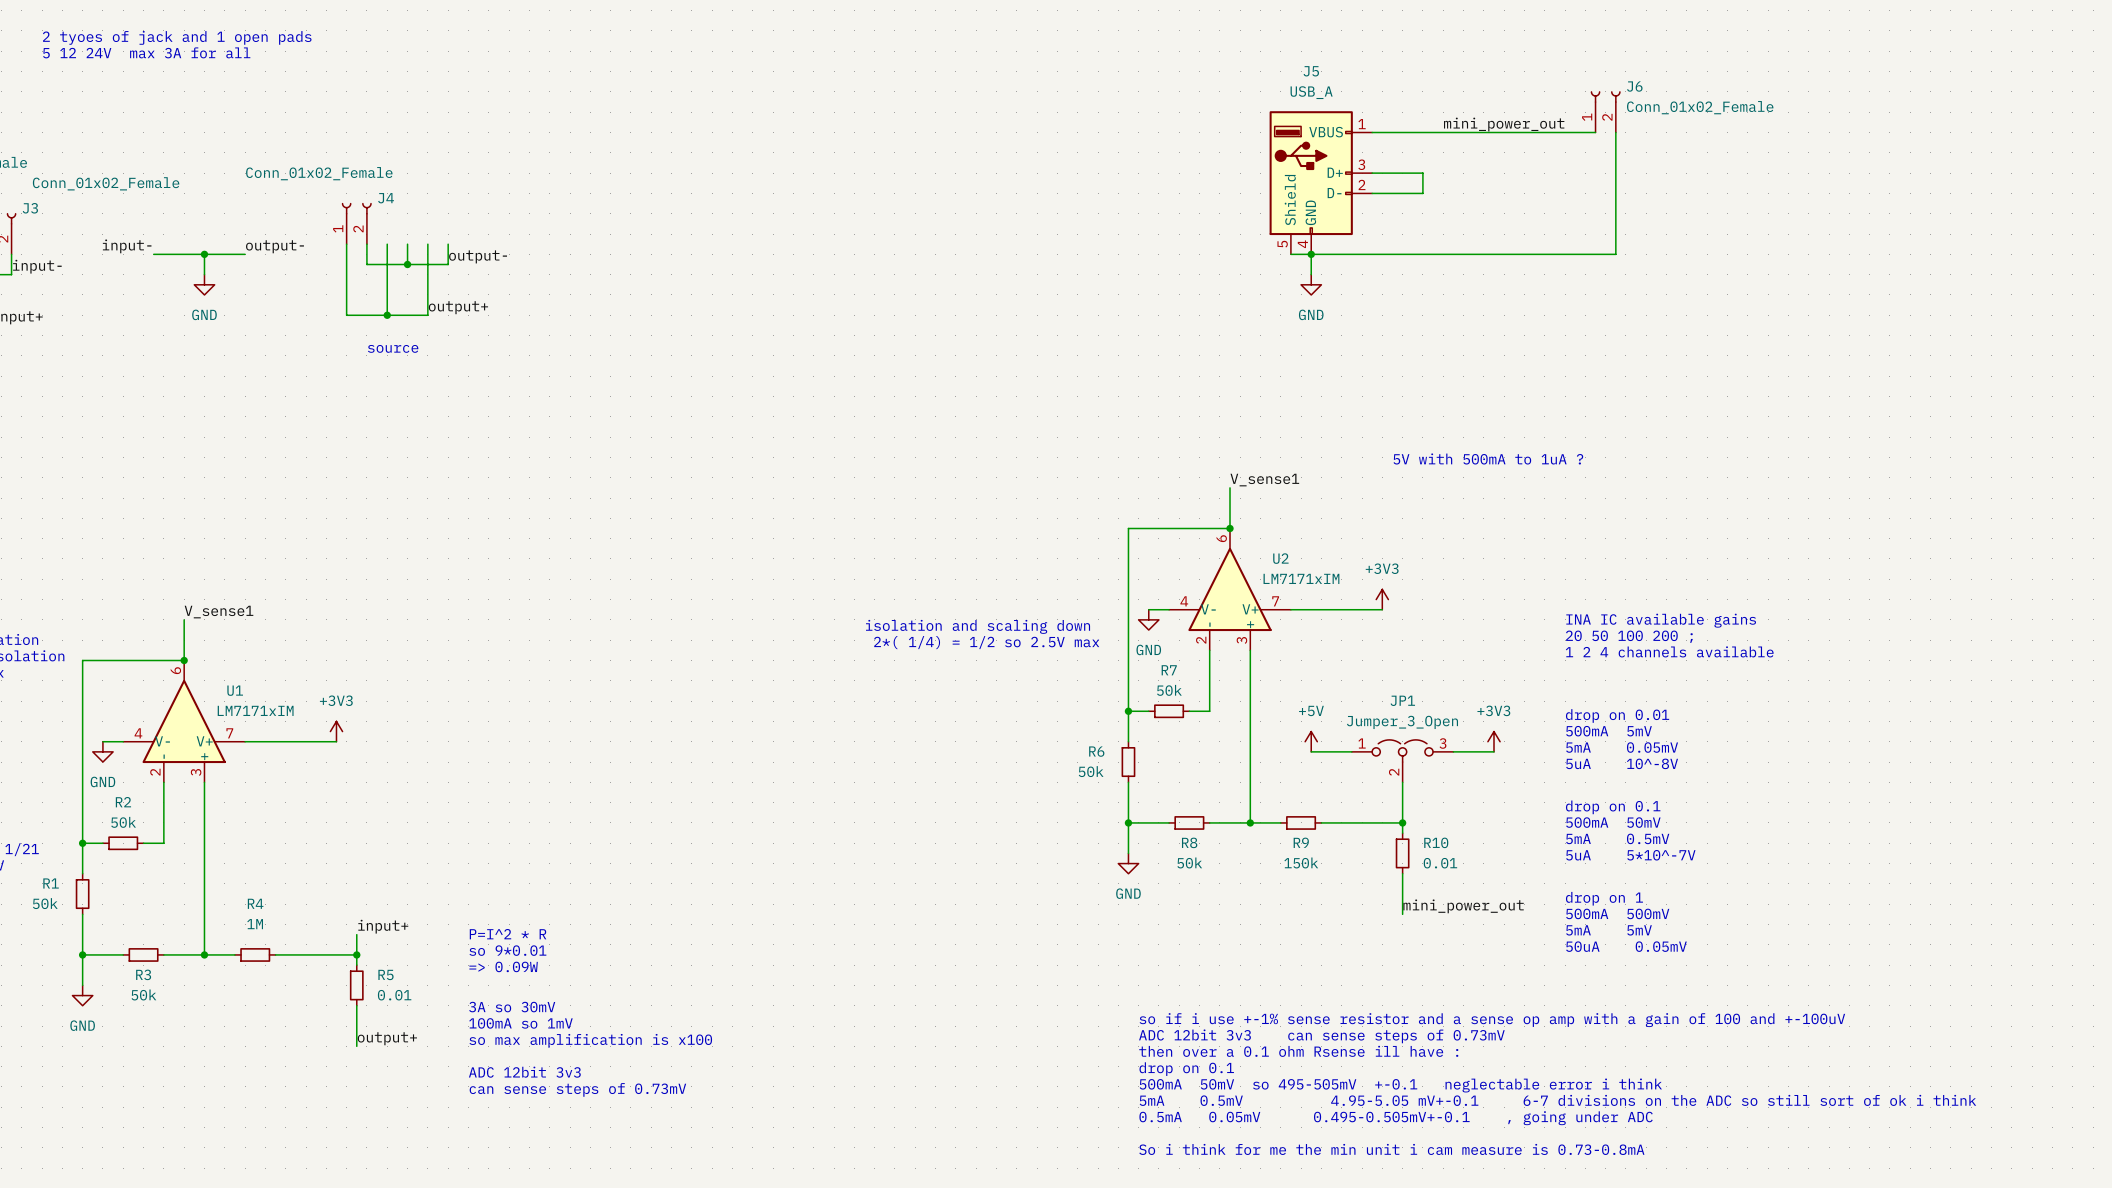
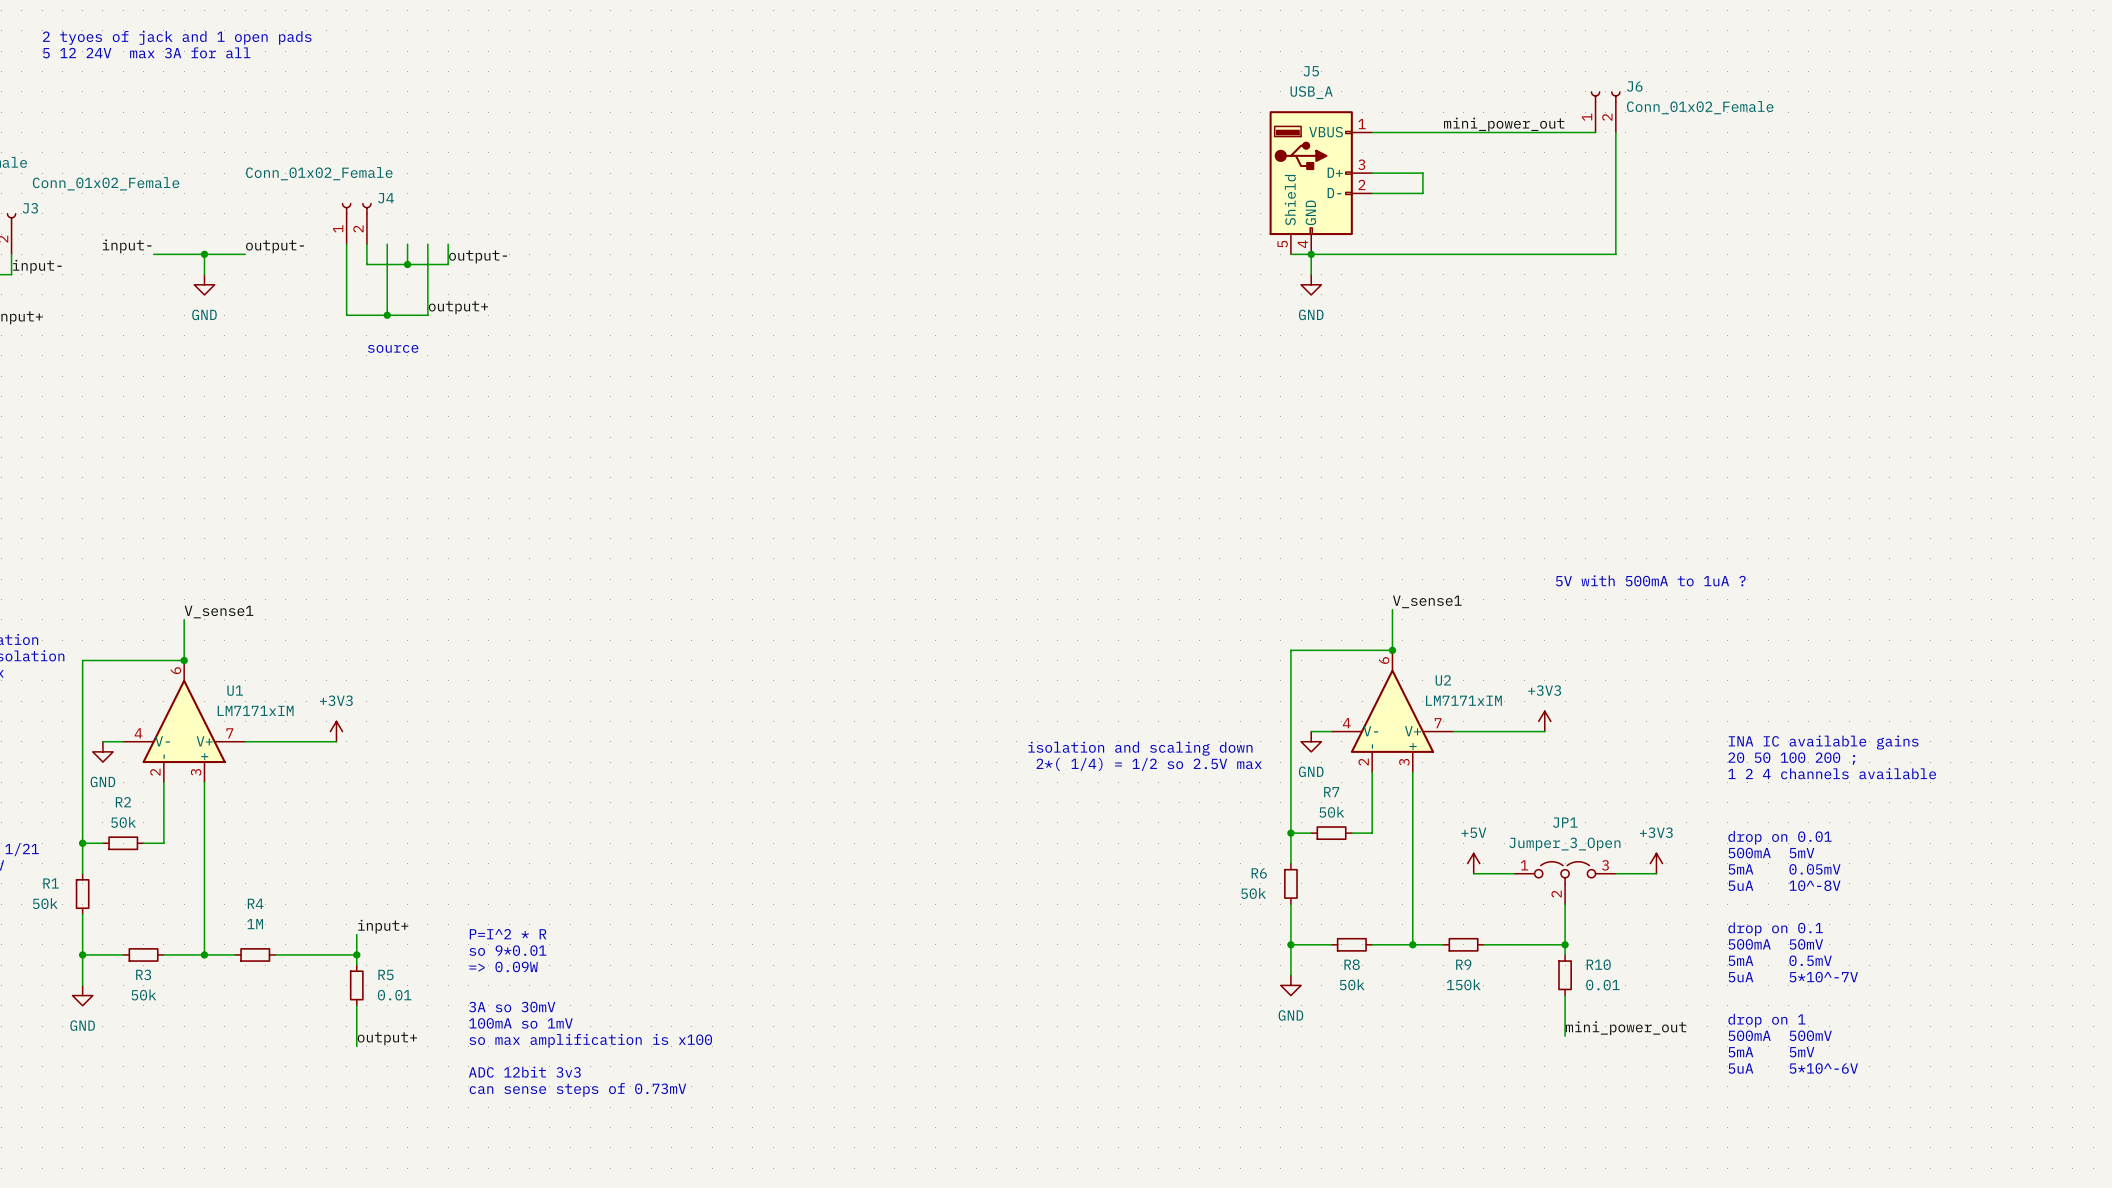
text: 5V with 500mA to 1uA ? (1488, 458) -> none
label: V_sense1 (1264, 480) -> none
wire: (1230, 487) (1230, 528) (1128, 528) (1128, 741) -> none
junction: (1230, 528) -> none
text: none -> 5V with 500mA to 1uA ? (1650, 580)
U2 position: (1230, 589) -> (1392, 711)
power symbol: +3V3 (1382, 599) -> none
label: none -> V_sense1 (1427, 601)
wire: (1148, 609) (1169, 609) -> none
wire: (1290, 609) (1382, 609) -> none
wire: none -> (1392, 609) (1392, 650) (1290, 650) (1290, 863)
power symbol: GND (1148, 619) -> none
text: INA IC available gains (1661, 620) -> none
text: isolation and scaling down (978, 626) -> none
text: 20 50 100 200 ; (1629, 636) -> none
text: 2*( 1/4) = 1/2 so 2.5V max (986, 642) -> none
wire: (1209, 650) (1209, 711) (1189, 711) -> none
wire: (1250, 650) (1250, 822) -> none
junction: none -> (1392, 650)
text: 1 2 4 channels available (1669, 651) -> none
wire: (1128, 711) (1148, 711) -> (1311, 731) (1331, 731)
junction: (1128, 711) -> none
R7 position: (1169, 711) -> (1331, 833)
text: drop on 0.01 (1617, 715) -> none
wire: none -> (1453, 731) (1544, 731)
text: 500mA 5mV (1608, 731) -> none
power symbol: +5V (1311, 741) -> GND (1311, 741)
power symbol position: +3V3 (1494, 741) -> +3V3 (1544, 721)
text: none -> INA IC available gains (1823, 742)
text: 5mA 0.05mV (1622, 747) -> none
text: none -> isolation and scaling down (1140, 748)
wire: (1311, 751) (1351, 751) -> (1290, 944) (1331, 944)
wire: (1453, 751) (1494, 751) -> (1473, 873) (1514, 873)
text: none -> 20 50 100 200 ; (1791, 758)
JP1 position: (1402, 761) -> (1565, 882)
R6 position: (1128, 762) -> (1290, 883)
text: 5uA 10^-8V (1622, 763) -> none
text: none -> 2*( 1/4) = 1/2 so 2.5V max (1149, 764)
wire: none -> (1372, 772) (1372, 833) (1351, 833)
wire: none -> (1412, 772) (1412, 944)
text: none -> 1 2 4 channels available (1832, 773)
wire: (1128, 782) (1128, 853) -> none
wire: (1402, 782) (1402, 833) -> none
text: drop on 0.1 (1613, 807) -> none
wire: (1128, 822) (1169, 822) -> none
junction: (1128, 822) -> none
R8 position: (1189, 822) -> (1351, 944)
wire: (1209, 822) (1280, 822) -> none
junction position: (1250, 822) -> (1290, 833)
R9 position: (1301, 822) -> (1463, 944)
wire: (1321, 822) (1402, 822) -> none
junction: (1402, 822) -> none
text: 500mA 50mV (1613, 822) -> none
wire: none -> (1290, 833) (1311, 833)
text: none -> drop on 0.01 (1780, 837)
text: 5mA 0.5mV (1617, 838) -> none
R10 position: (1402, 853) -> (1565, 975)
text: none -> 500mA 5mV (1771, 853)
text: 5uA 5*10^-7V (1630, 855) -> none
power symbol: GND (1128, 863) -> none
power symbol: none -> +5V (1473, 863)
power symbol: none -> +3V3 (1656, 863)
text: none -> 5mA 0.05mV (1784, 869)
wire: (1402, 873) (1402, 914) -> none
wire: none -> (1615, 873) (1656, 873)
text: none -> 5uA 10^-8V (1784, 885)
text: drop on 1 (1604, 898) -> none
wire: none -> (1290, 904) (1290, 975)
wire: none -> (1565, 904) (1565, 954)
label: mini_power_out (1463, 906) -> none
text: 500mA 500mV (1617, 913) -> none
text: none -> drop on 0.1 (1775, 929)
text: 5mA 5mV (1608, 930) -> none
junction: none -> (1290, 944)
wire: none -> (1372, 944) (1443, 944)
junction: none -> (1412, 944)
wire: none -> (1483, 944) (1565, 944)
junction: none -> (1565, 944)
text: none -> 500mA 50mV (1775, 944)
text: 50uA 0.05mV (1626, 946) -> none
text: none -> 5mA 0.5mV (1780, 960)
text: none -> 5uA 5*10^-7V (1793, 977)
power symbol: none -> GND (1290, 985)
wire: none -> (1565, 995) (1565, 1036)
text: so if i use +-1% sense resistor and a sense op amp with a gain of 100 and +-100uV (1492, 1020) -> none
text: none -> drop on 1 (1766, 1020)
label: none -> mini_power_out (1626, 1028)
text: none -> 500mA 500mV (1780, 1035)
text: ADC 12bit 3v3 can sense steps of 0.73mV (1321, 1036) -> none
text: then over a 0.1 ohm Rsense ill have : (1298, 1051) -> none
text: none -> 5mA 5mV (1771, 1052)
text: none -> 5uA 5*10^-6V (1793, 1068)
text: drop on 0.1 (1186, 1069) -> none
text: 500mA 50mV so 495-505mV +-0.1 neglectable error i think (1400, 1085) -> none
text: 5mA 0.5mV 4.95-5.05 mV+-0.1 6-7 divisions on the ADC so still sort of ok i think (1557, 1100) -> none
text: 0.5mA 0.05mV 0.495-0.505mV+-0.1 , going under ADC (1396, 1118) -> none
text: So i think for me the min unit i cam measure is 0.73-0.8mA (1391, 1149) -> none

